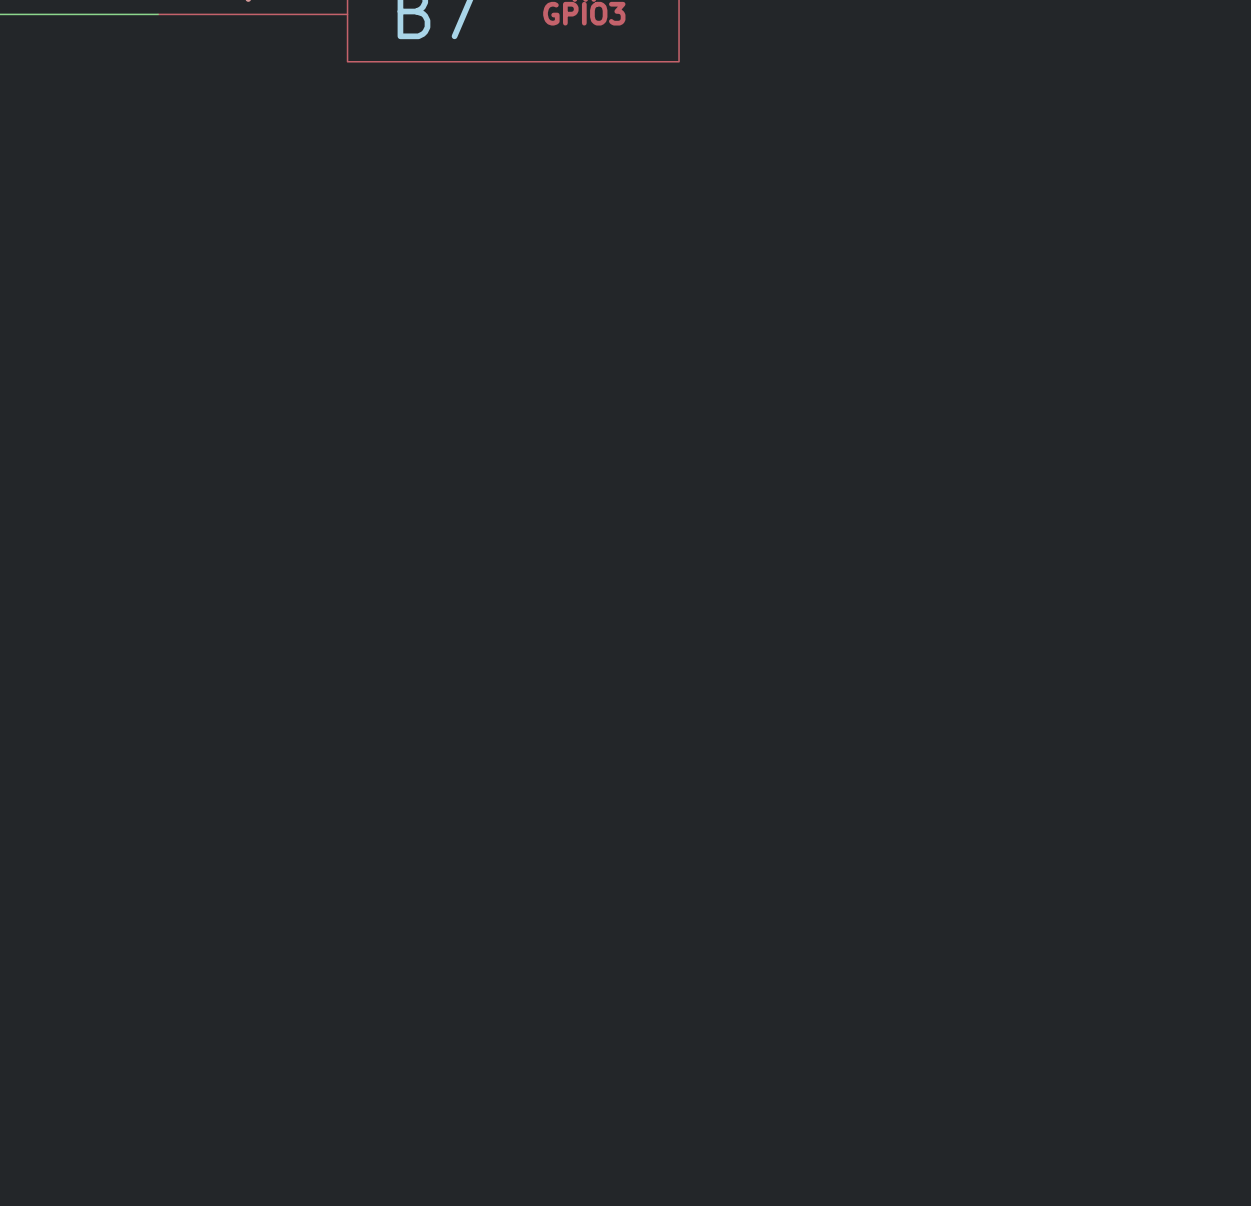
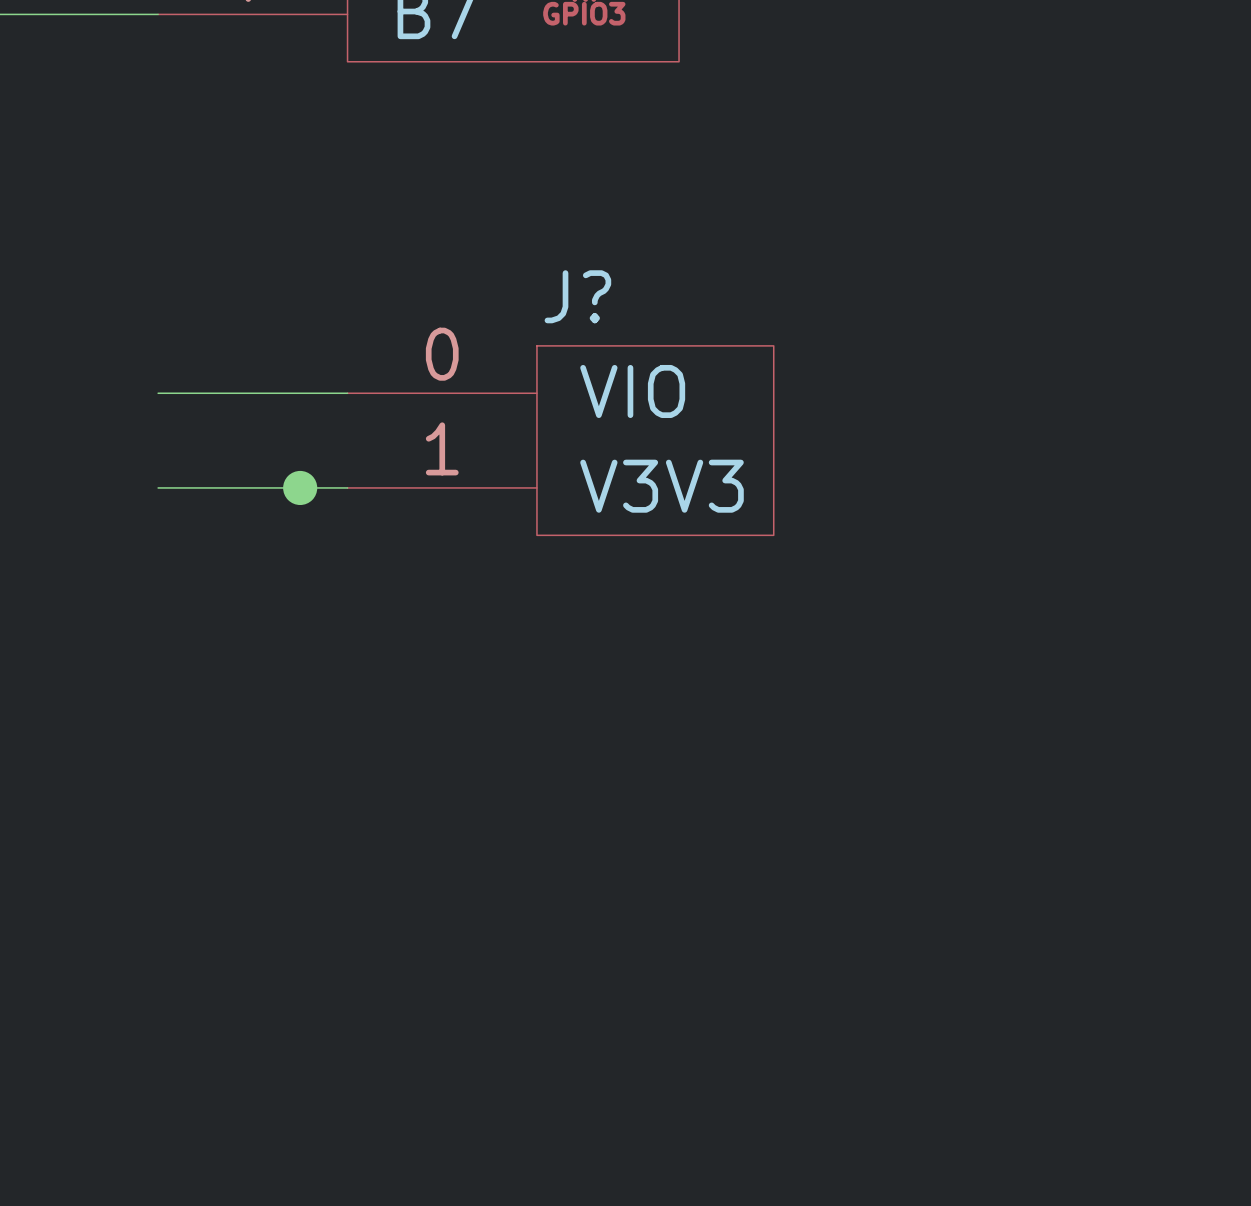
wire: none -> (158, 393) (347, 393)
J?: none -> (560, 440)
wire: none -> (158, 487) (347, 487)
junction: none -> (300, 487)

